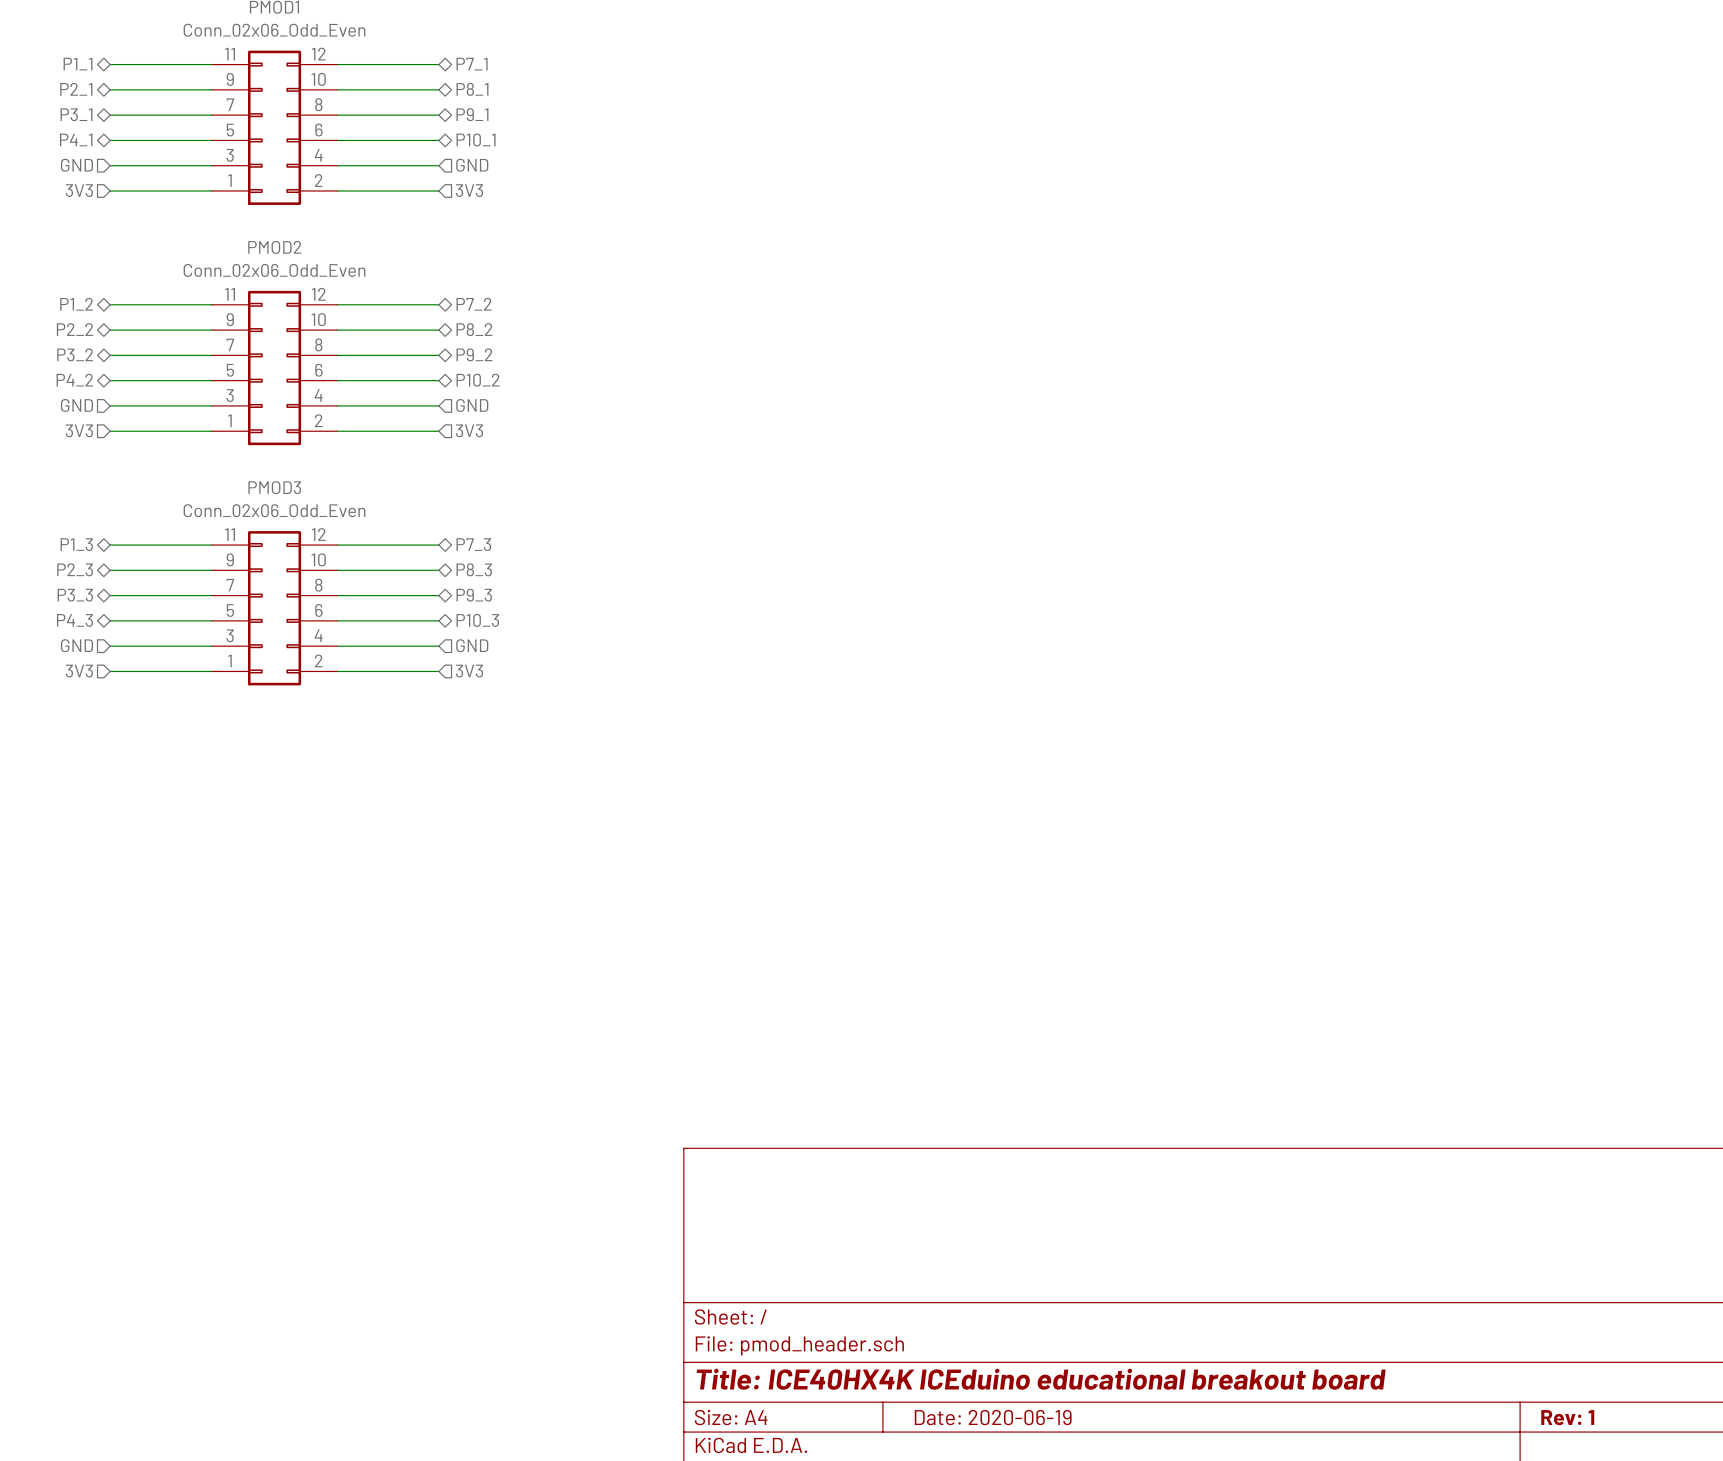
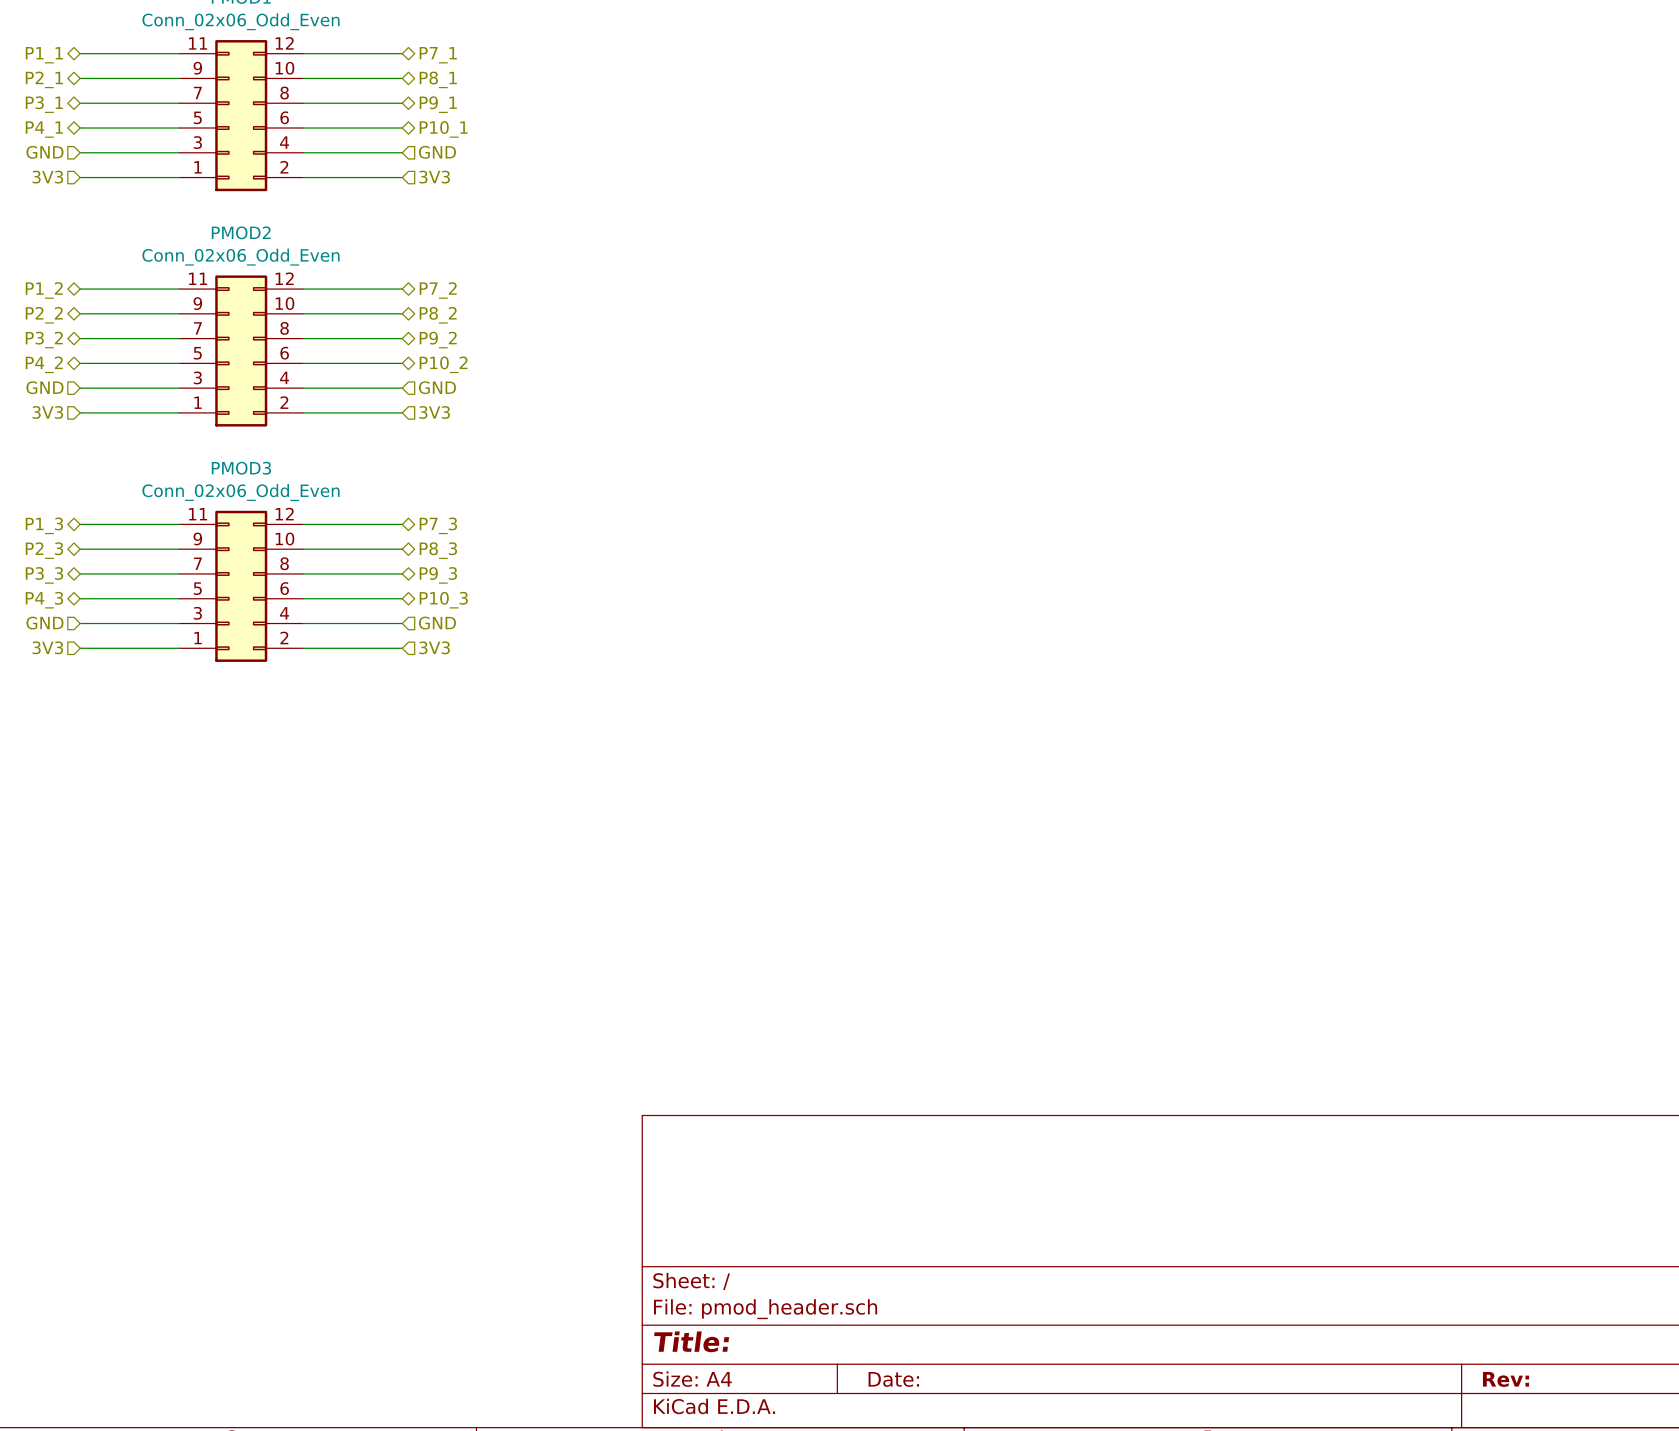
title block: Title: ICE40HX4K ICEduino educational breakout board (1041, 1379) -> Title: (691, 1341)
title block: Date: 2020-06-19 (993, 1417) -> Date: (893, 1379)
title block: Rev: 1 (1567, 1417) -> Rev: (1506, 1379)

